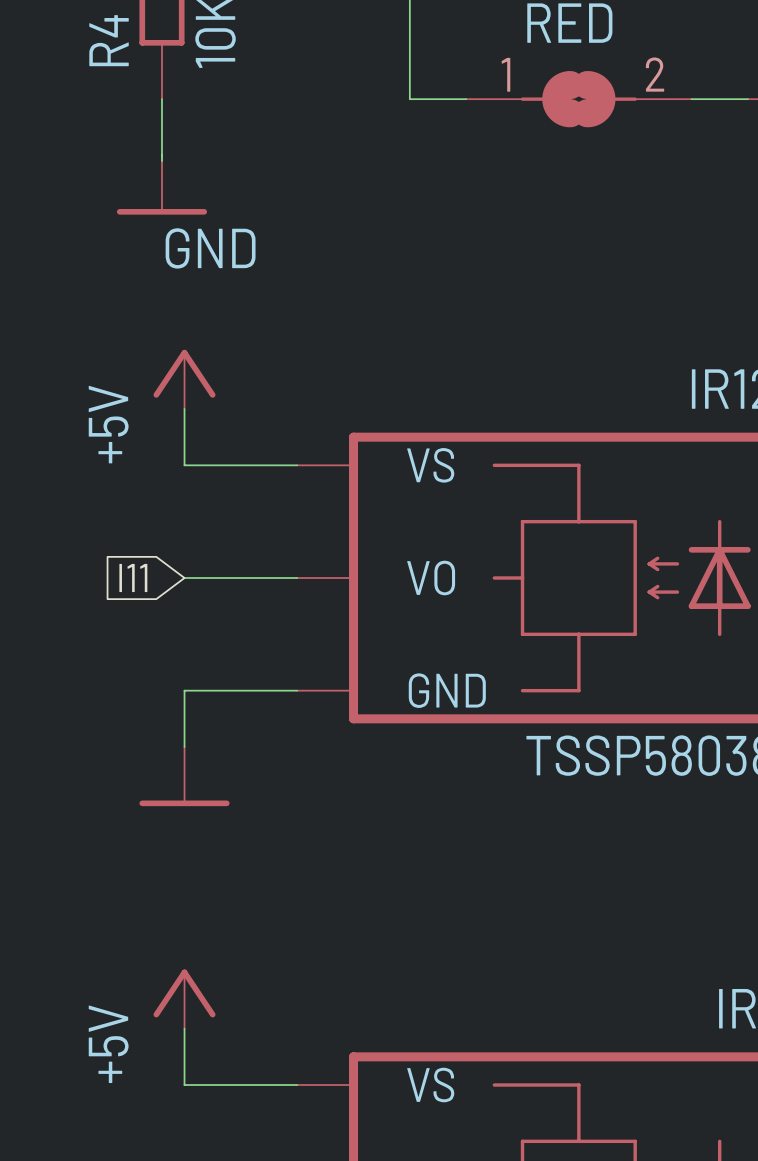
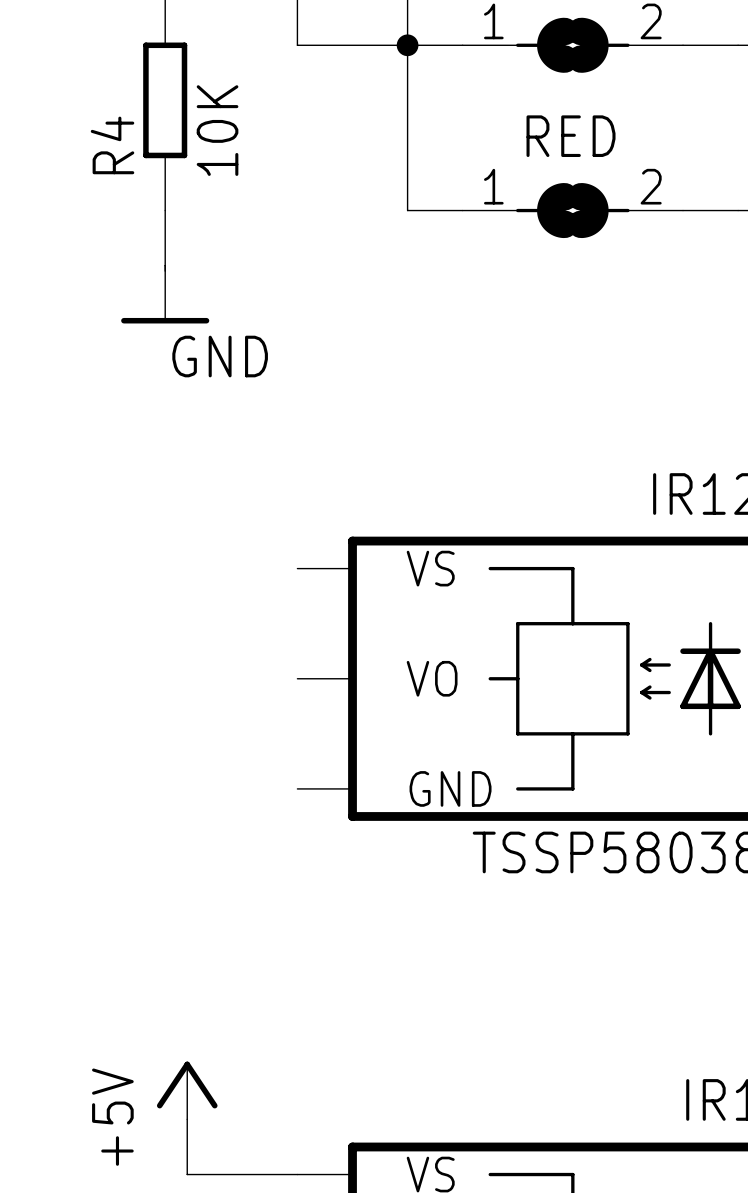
power symbol: +5V (184, 379) -> none
wire: (184, 408) (184, 465) (297, 465) -> none
global label: I11 (133, 578) -> none
wire: (184, 578) (297, 578) -> none
wire: (297, 690) (184, 690) (184, 747) -> none
power symbol: (184, 776) -> none

